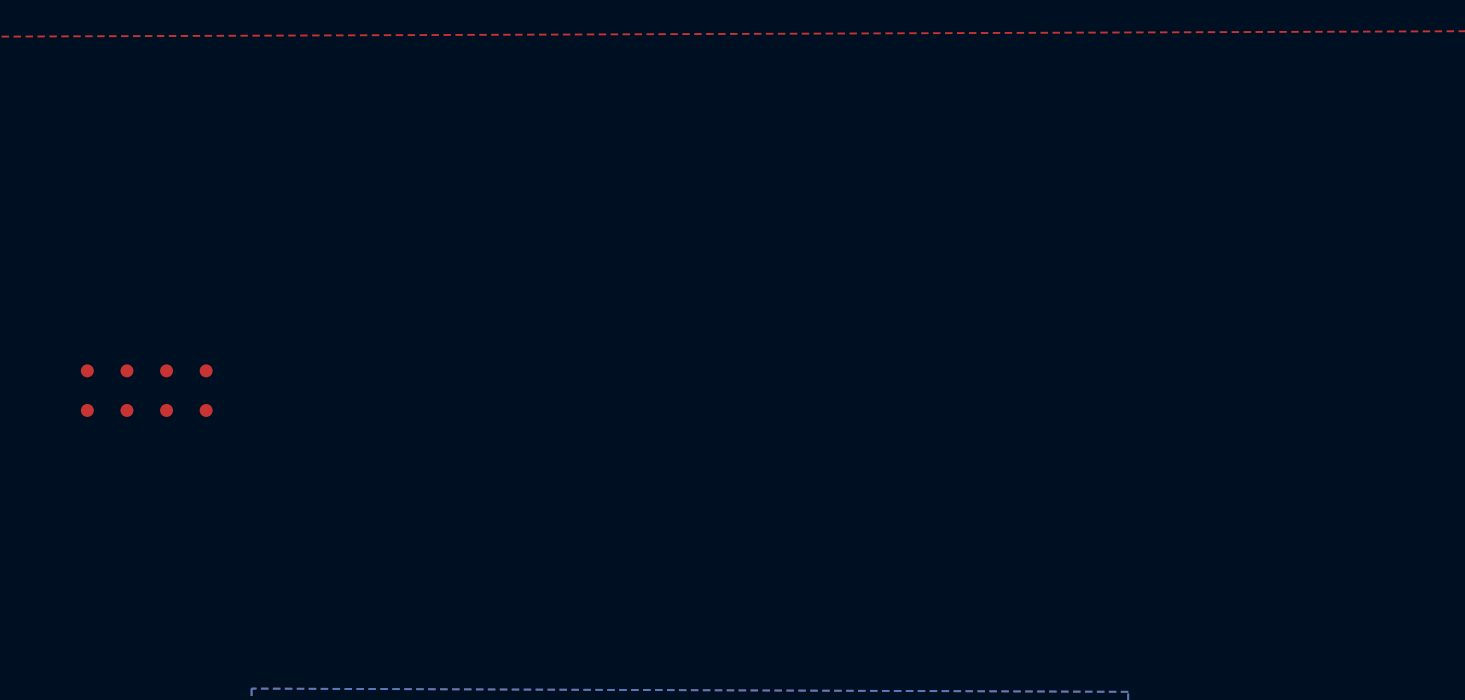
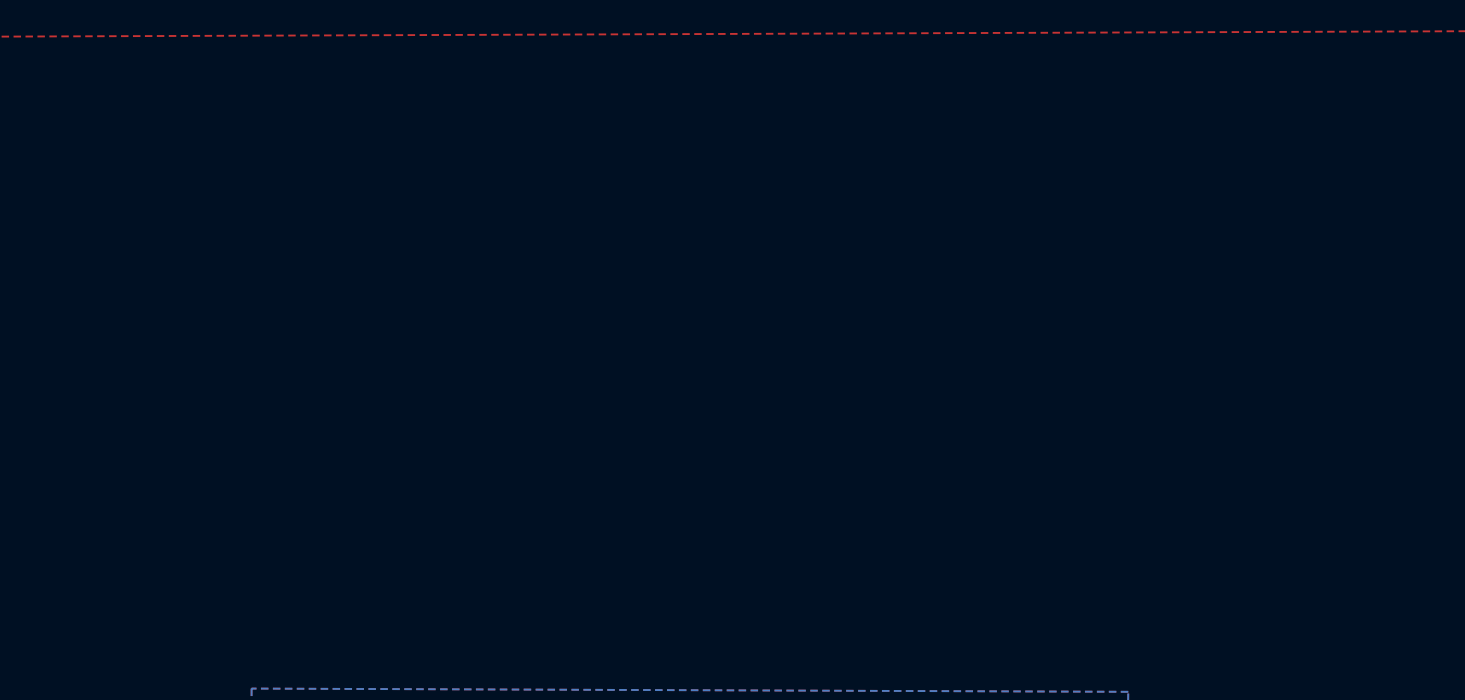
part: (87, 370) -> none
part: (126, 370) -> none
part: (166, 370) -> none
part: (206, 370) -> none
part: (87, 410) -> none
part: (126, 410) -> none
part: (166, 410) -> none
part: (206, 410) -> none

